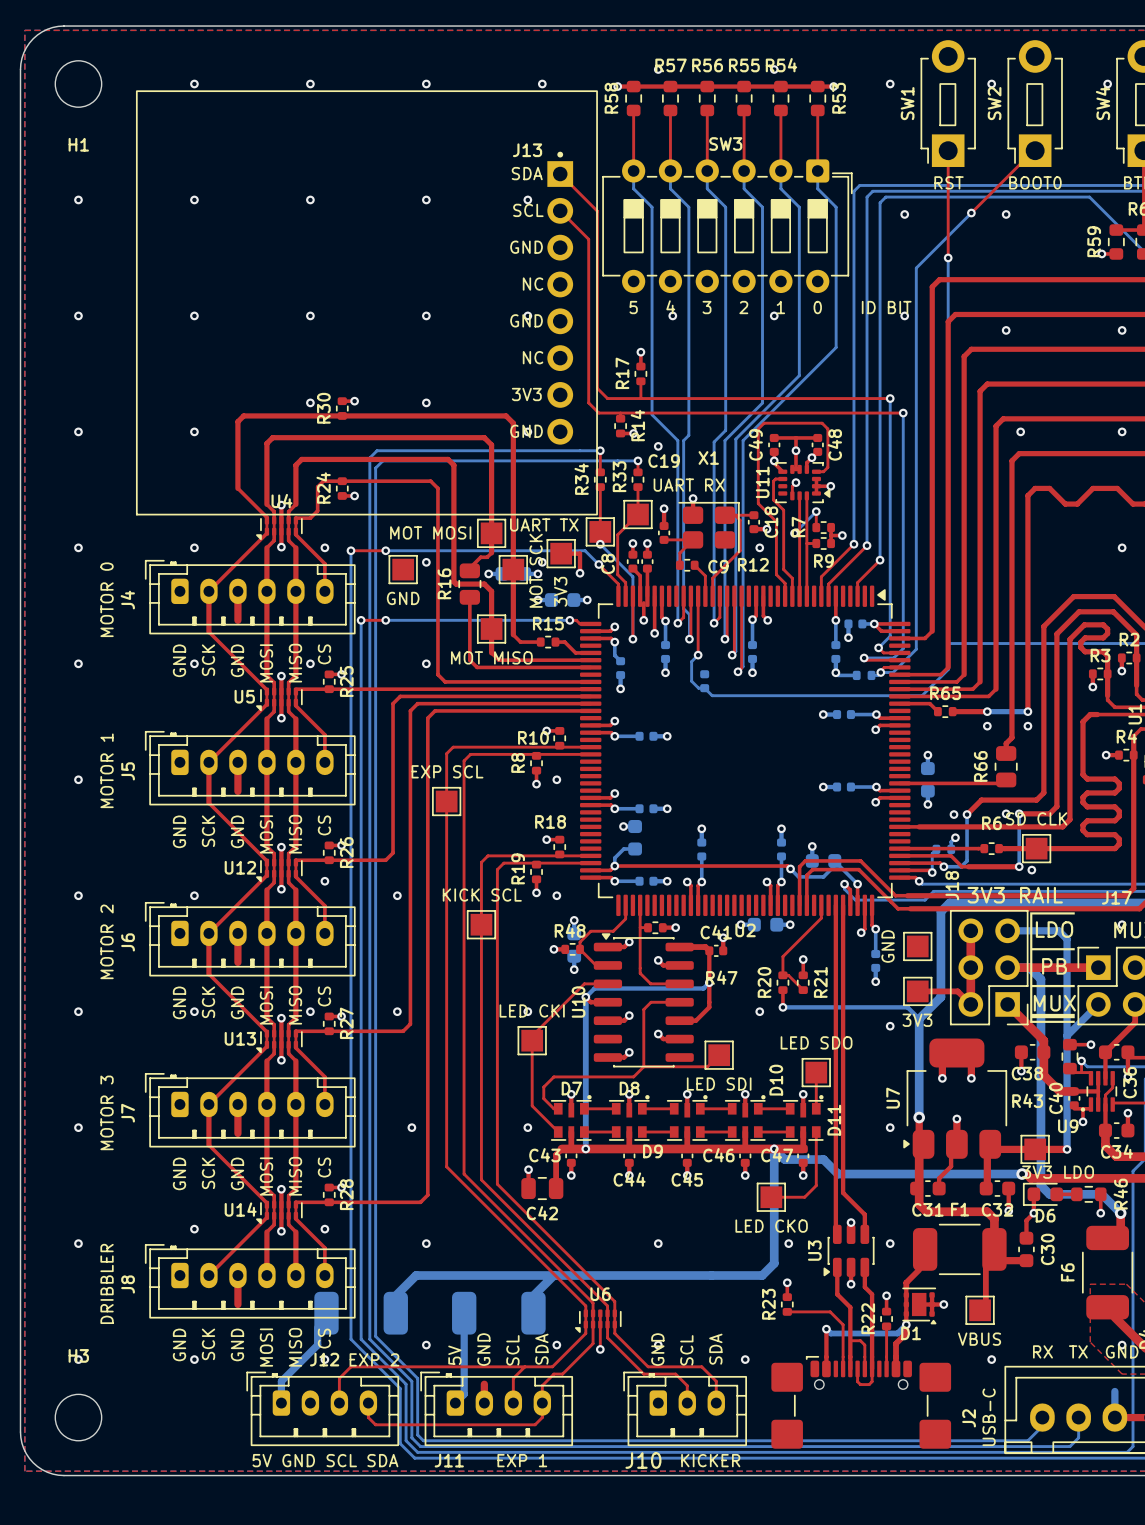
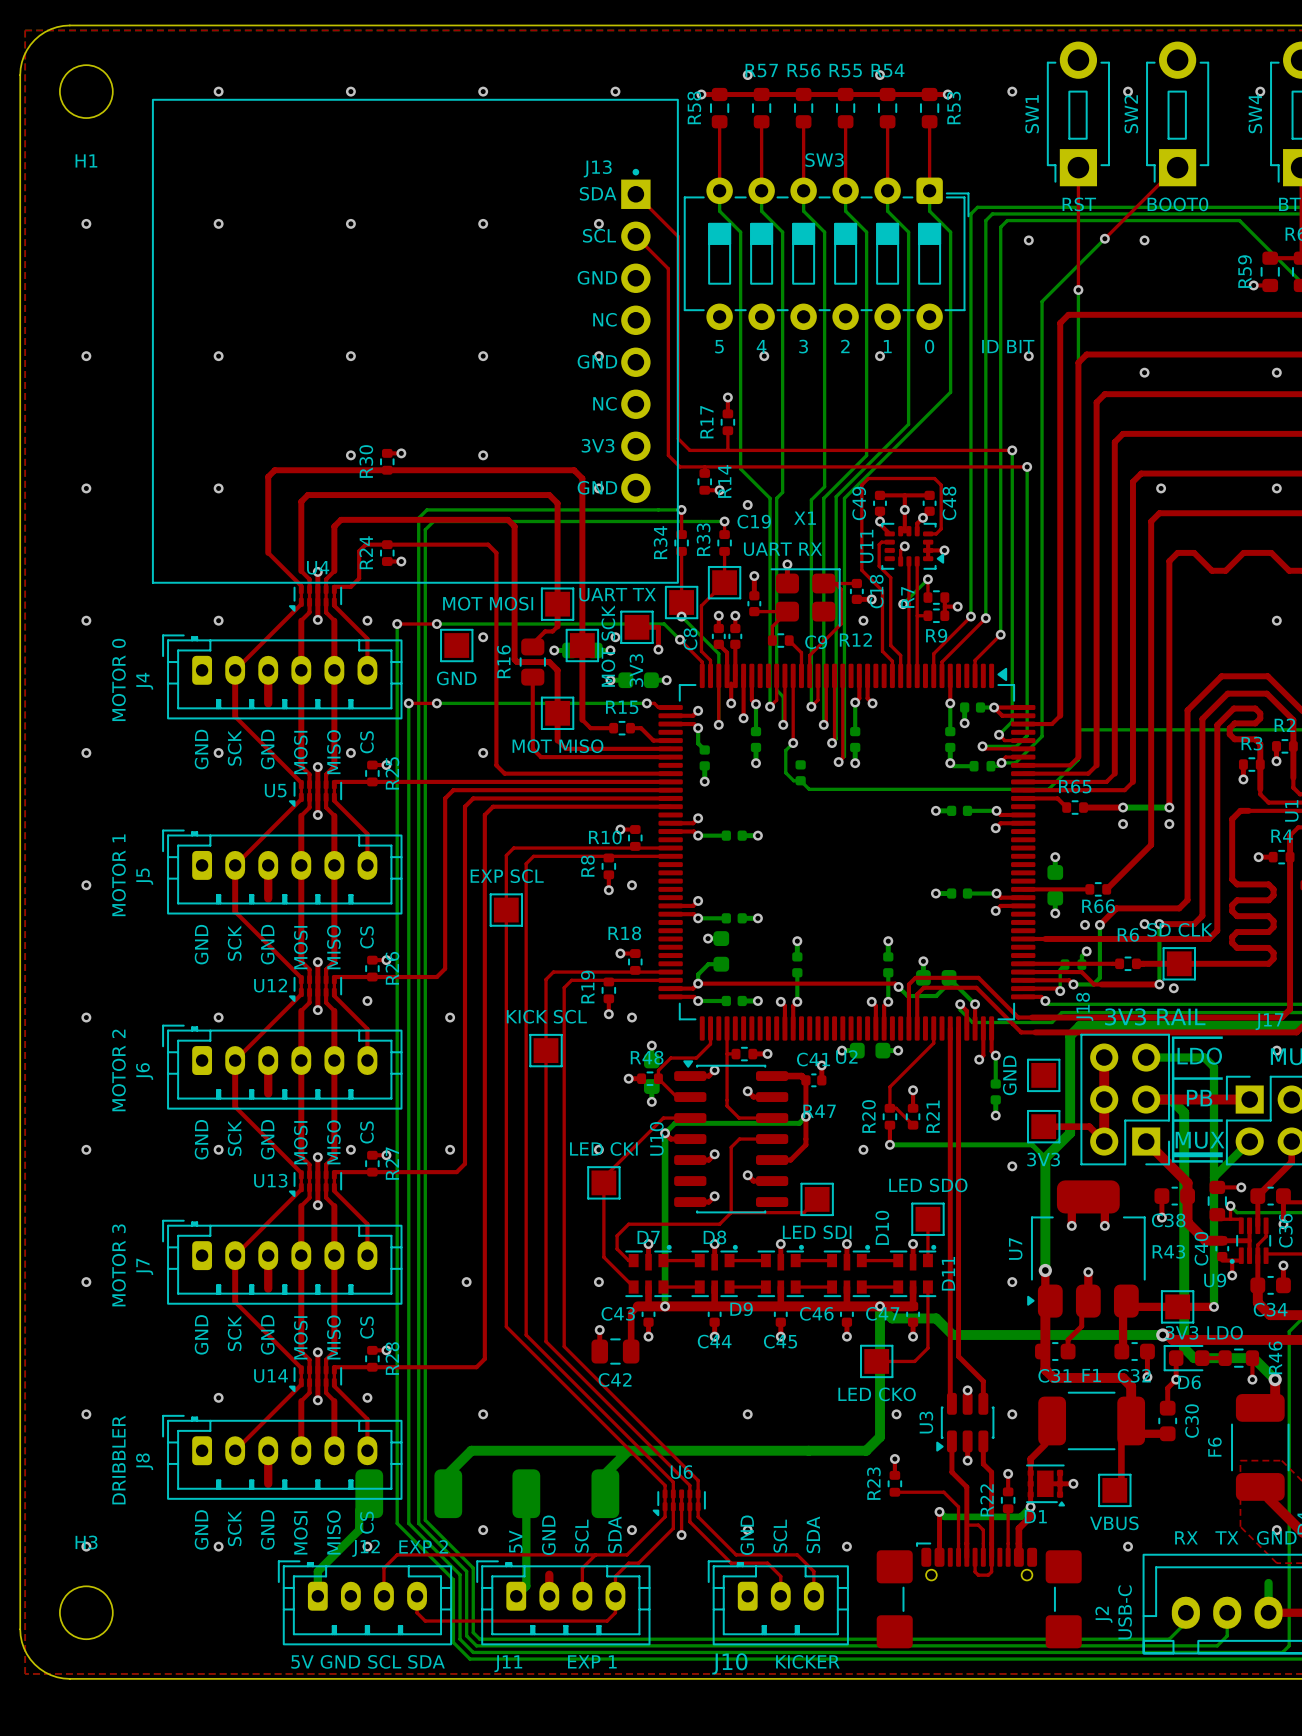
top track: (1011, 737) (1006, 743) (1006, 753) -> (1151, 837) (1151, 844) (1106, 889)
R66 footprint: [994, 746, 1018, 788] -> [1085, 882, 1112, 897]
R66 name position: R66 (980, 766) -> R66 (1098, 906)
top track: (958, 783) (1006, 783) -> none

